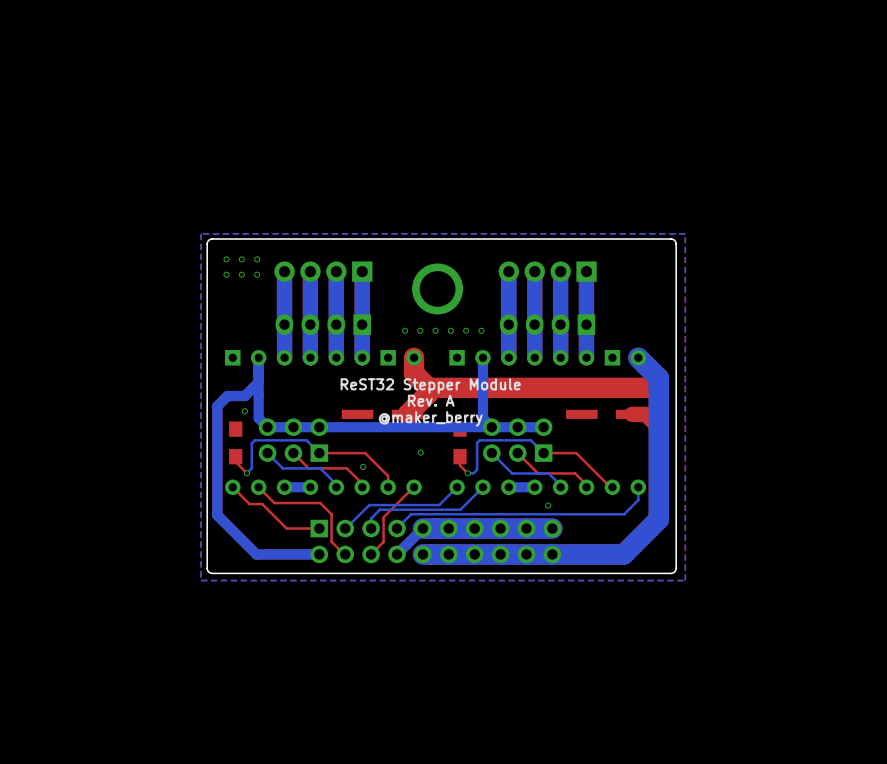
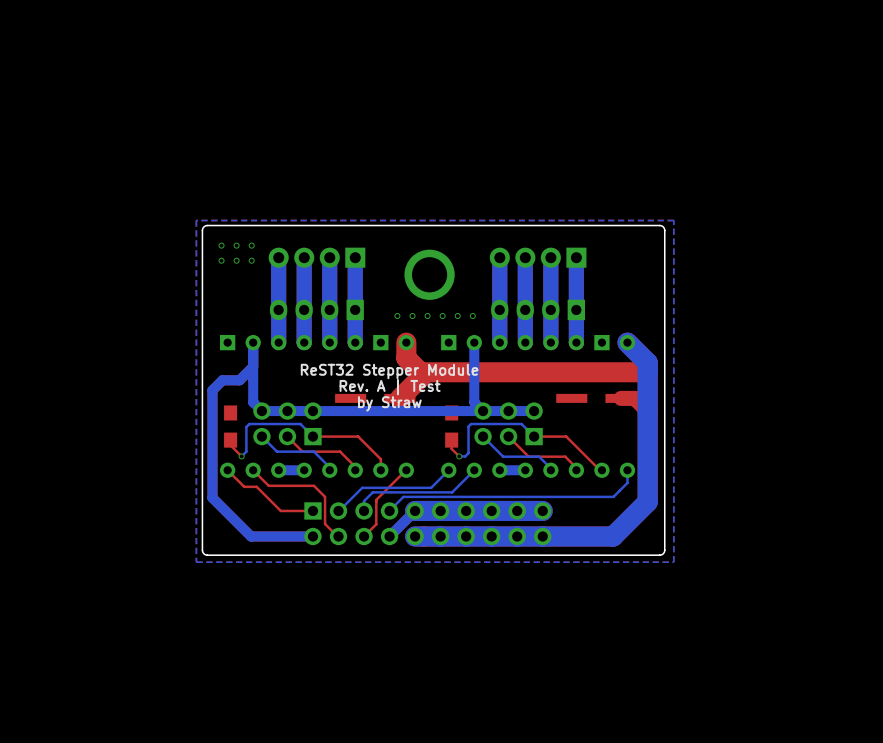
text position: ReST32 Stepper Module (430, 386) -> ReST32 Stepper Module (389, 371)
text: Rev. A (431, 400) -> Rev. A | Test (390, 387)
part: (244, 411) -> none
text: @maker_berry (430, 418) -> none
text: none -> by Straw (389, 403)
part: (420, 452) -> none
part: (363, 466) -> none
part: (548, 505) -> none

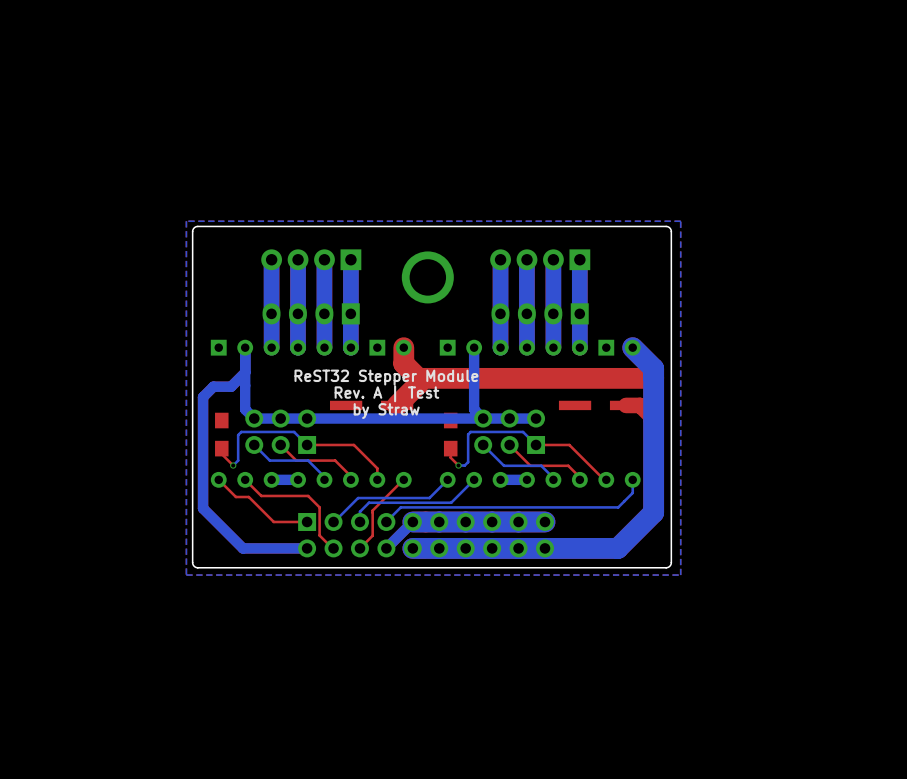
part: (221, 245) -> none
part: (236, 245) -> none
part: (251, 245) -> none
part: (221, 260) -> none
part: (236, 260) -> none
part: (251, 260) -> none
part: (397, 315) -> none
part: (412, 315) -> none
part: (427, 315) -> none
part: (442, 315) -> none
part: (457, 315) -> none
part: (472, 315) -> none

